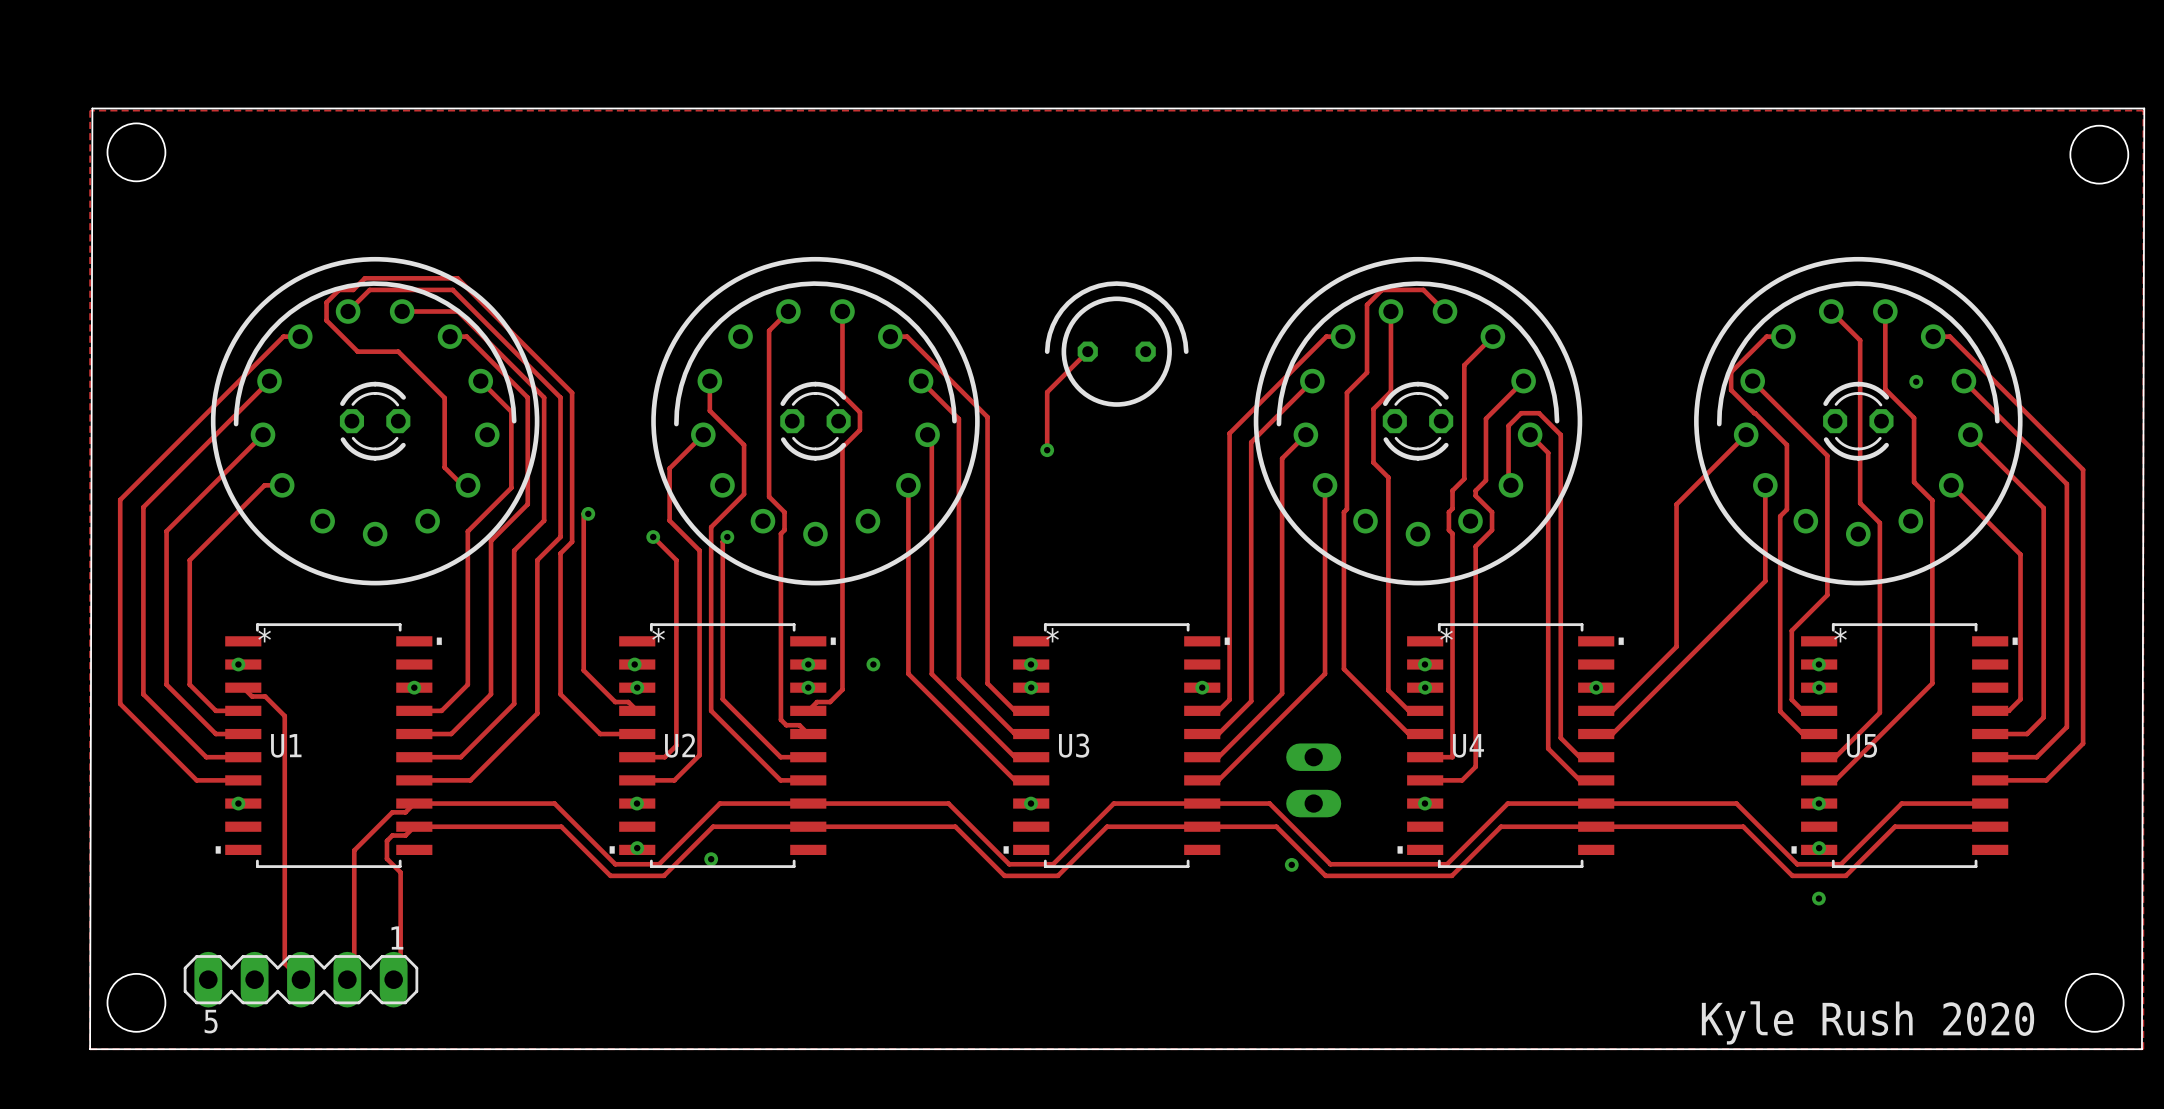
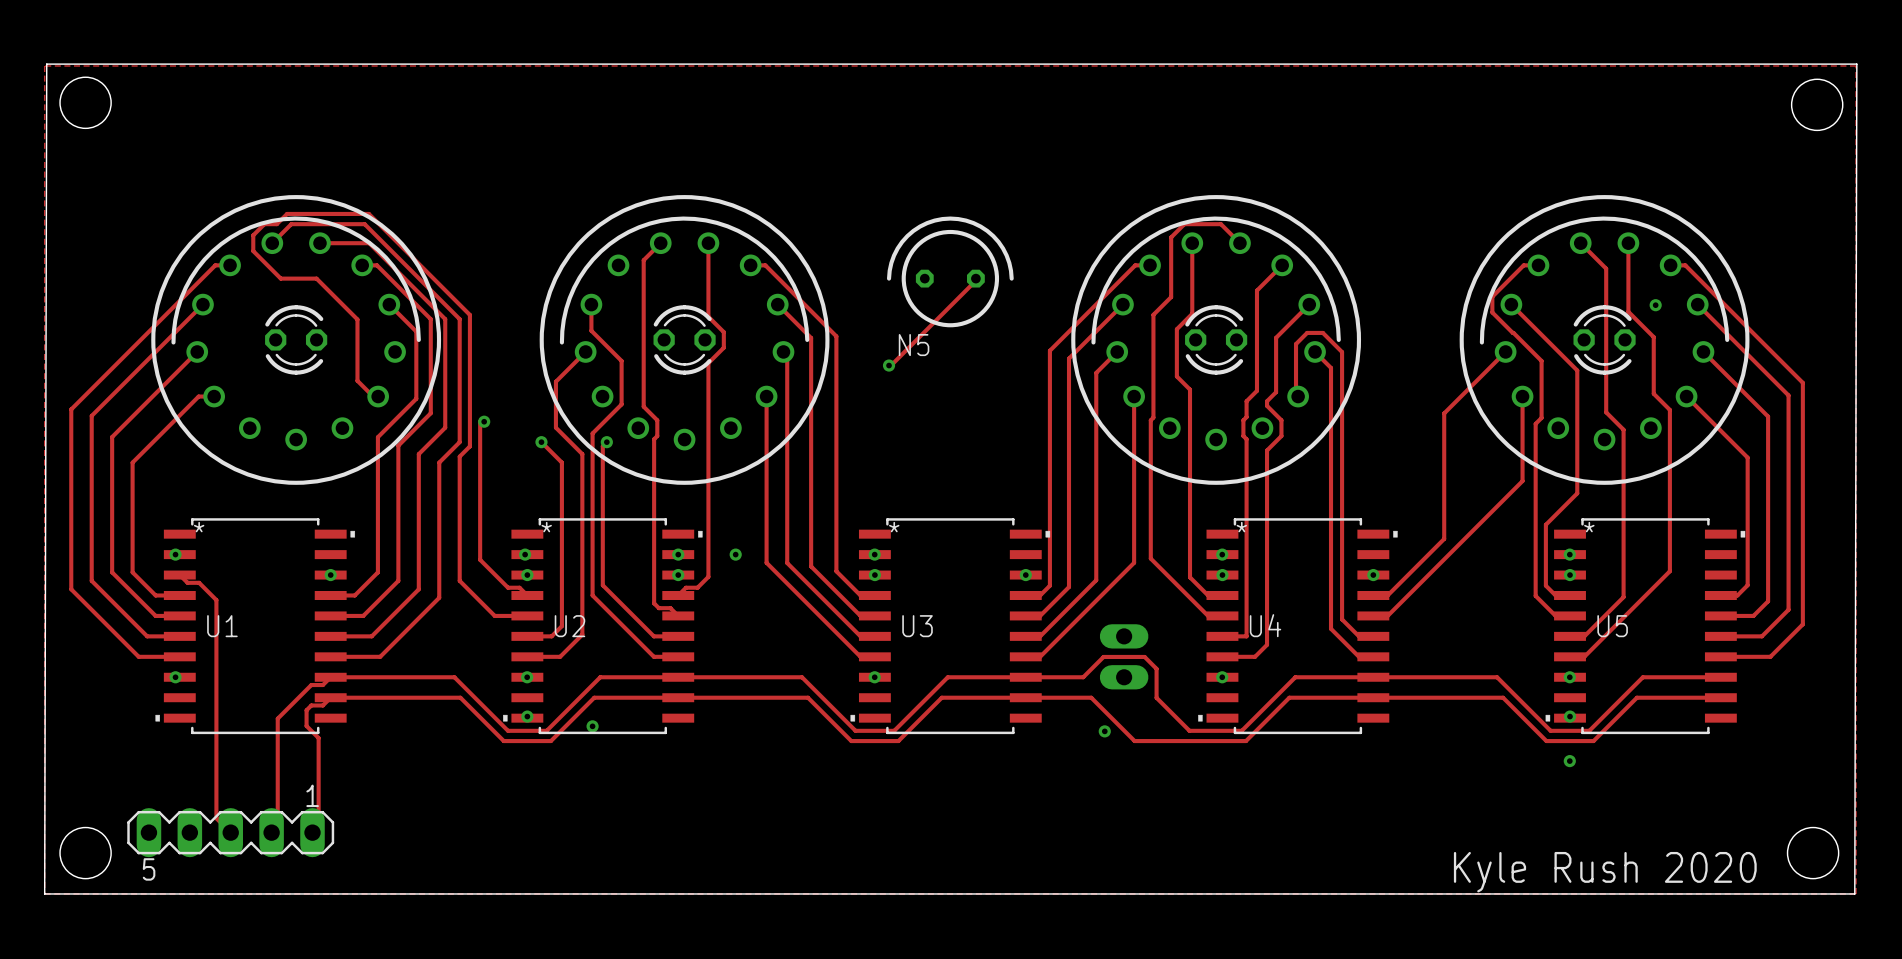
track: (1087, 351) (1047, 392) (1047, 450) -> (975, 280) (889, 365)
N5 name: none -> N5 (914, 345)
track: (1267, 803) (1269, 803) (1330, 864) (1387, 864) -> (1083, 677) (1103, 656) (1144, 656) (1156, 668) (1156, 697) (1189, 730)

